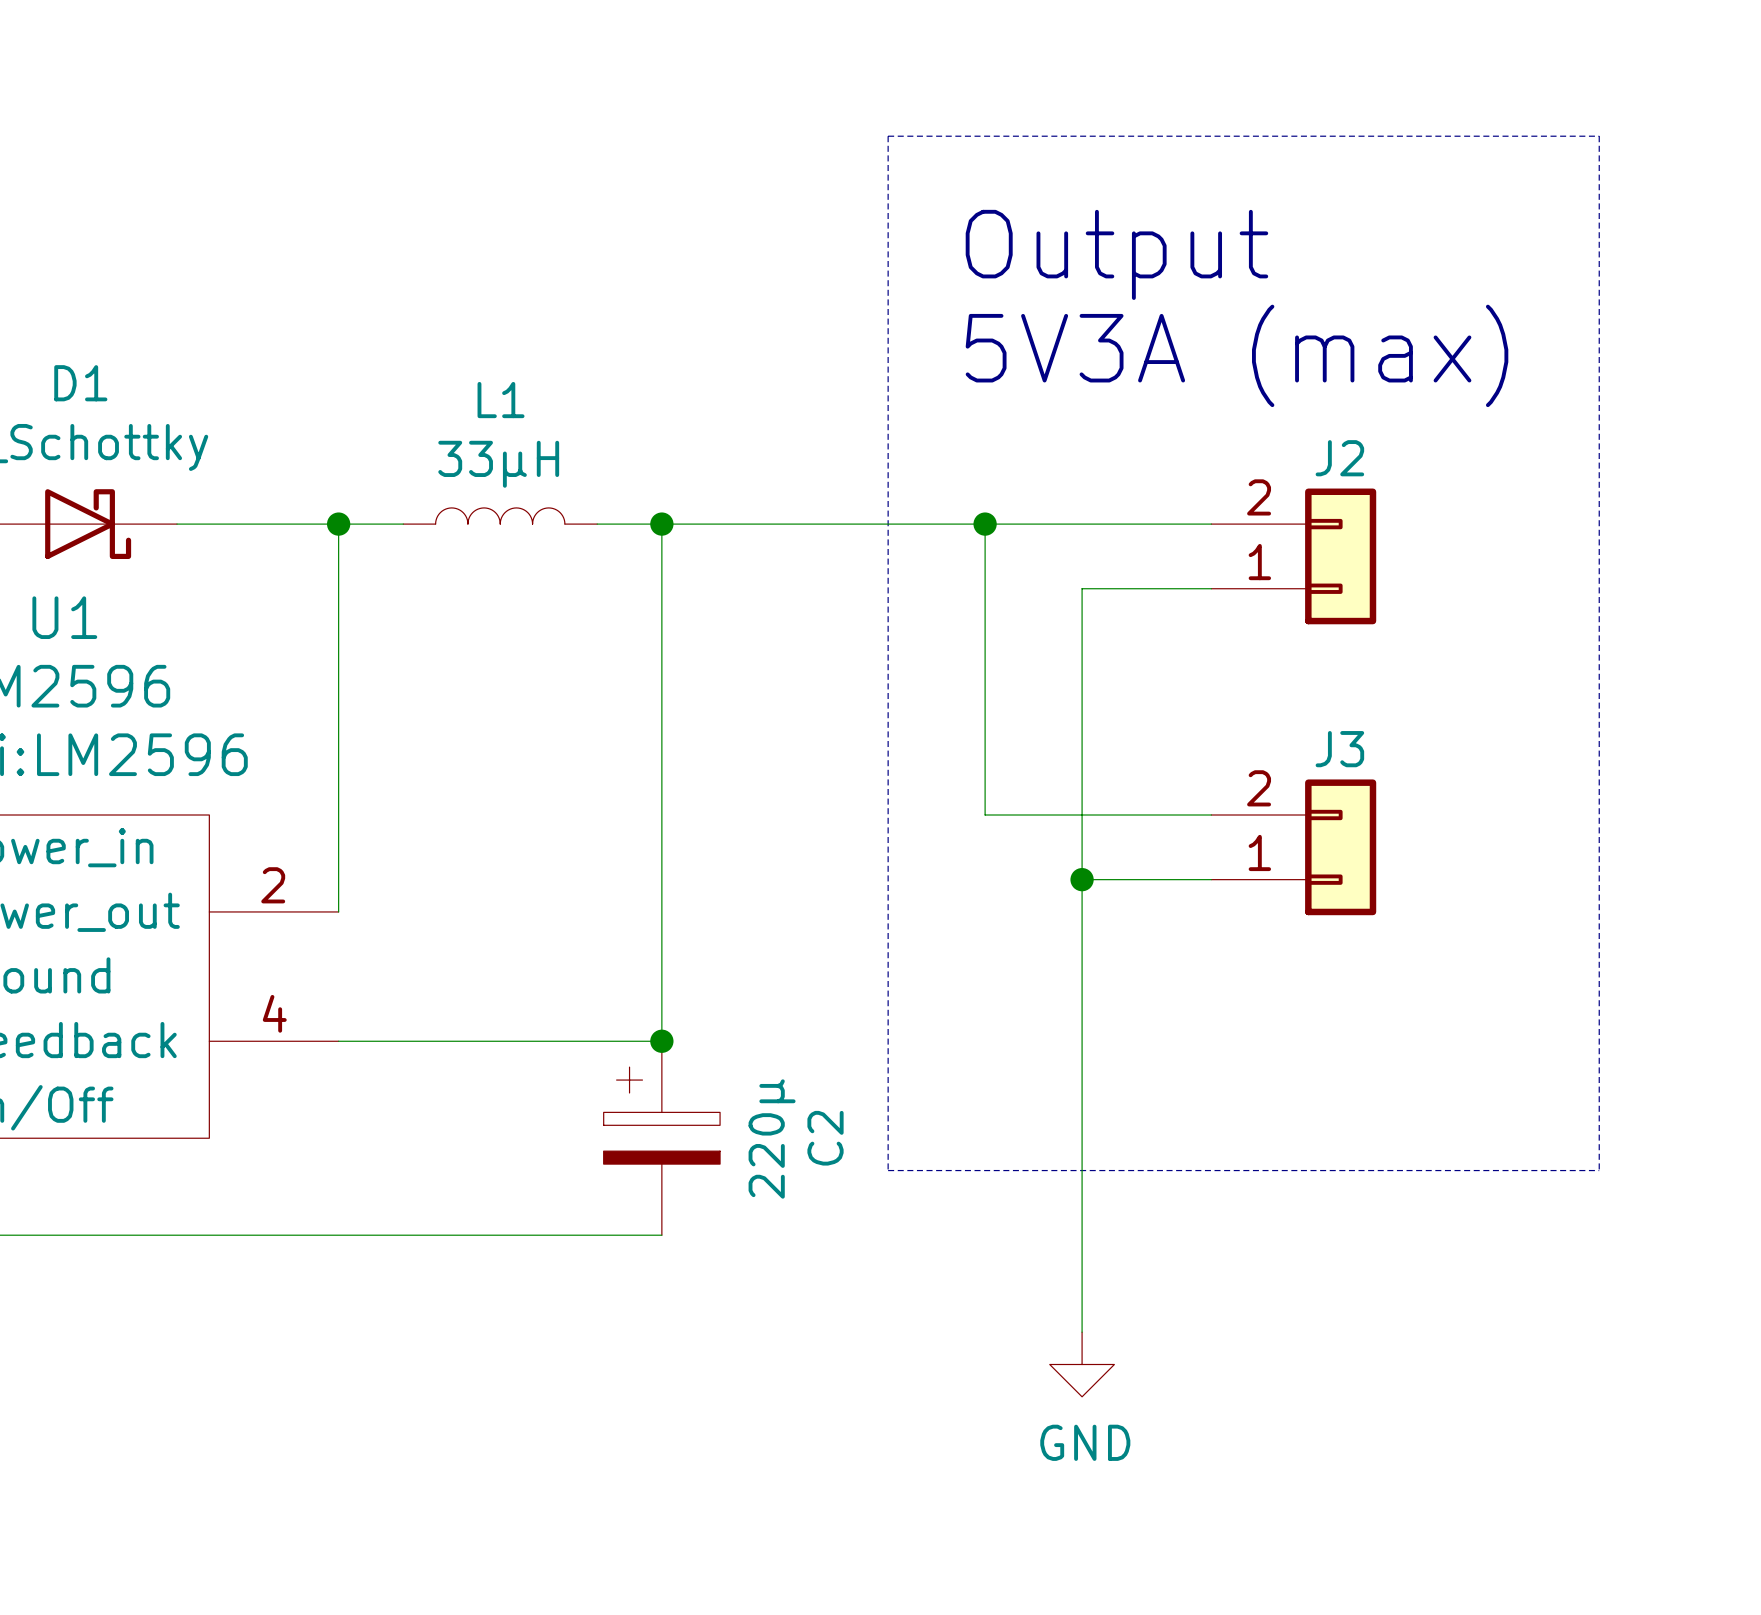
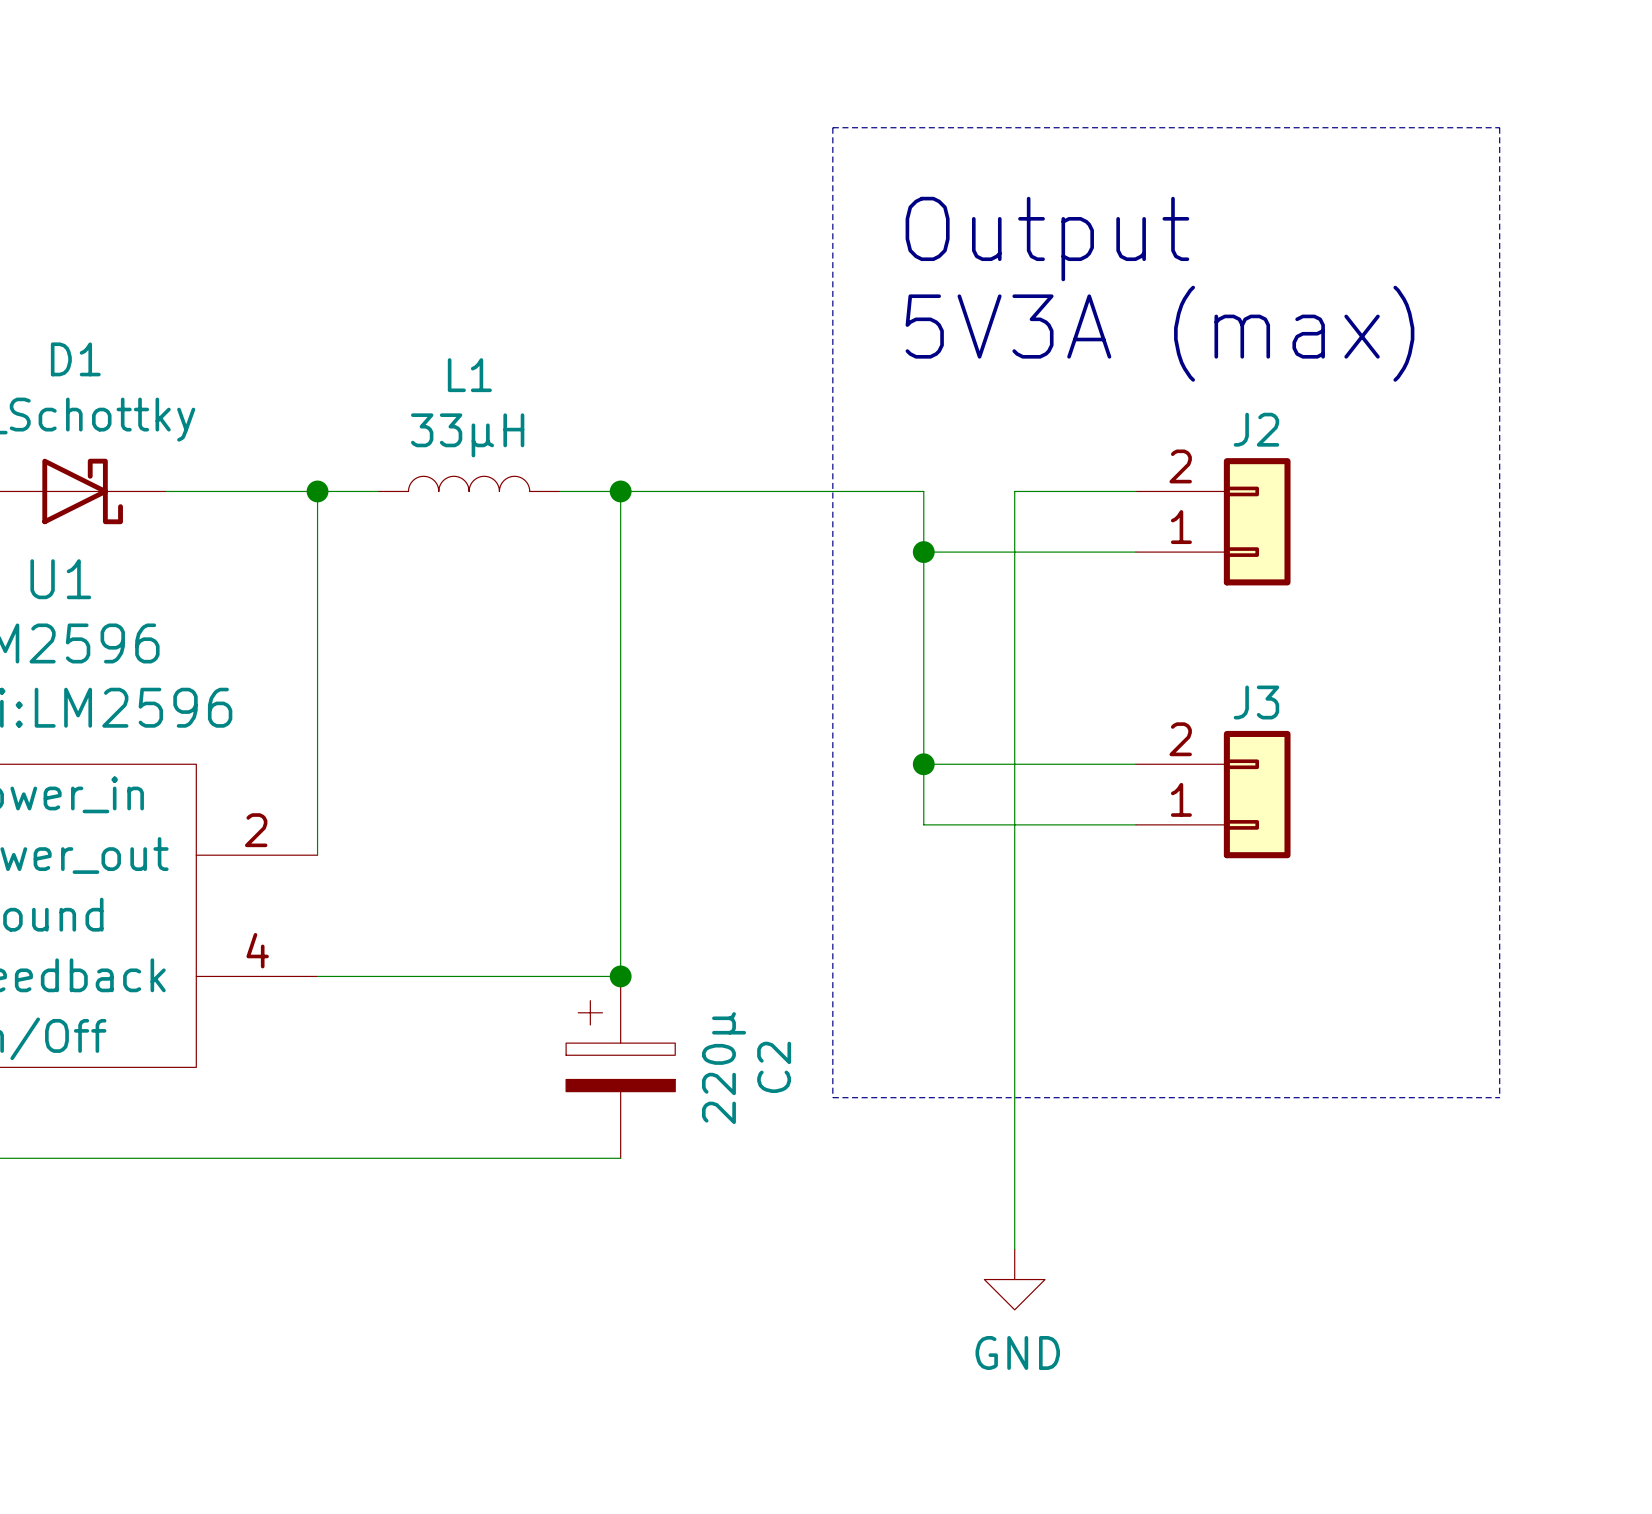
wire: (985, 524) (1082, 524) -> (923, 552) (1014, 552) (1014, 491)
junction position: (985, 524) -> (923, 552)
wire: none -> (923, 764) (923, 824) (1014, 824)
junction position: (1082, 879) -> (923, 764)

